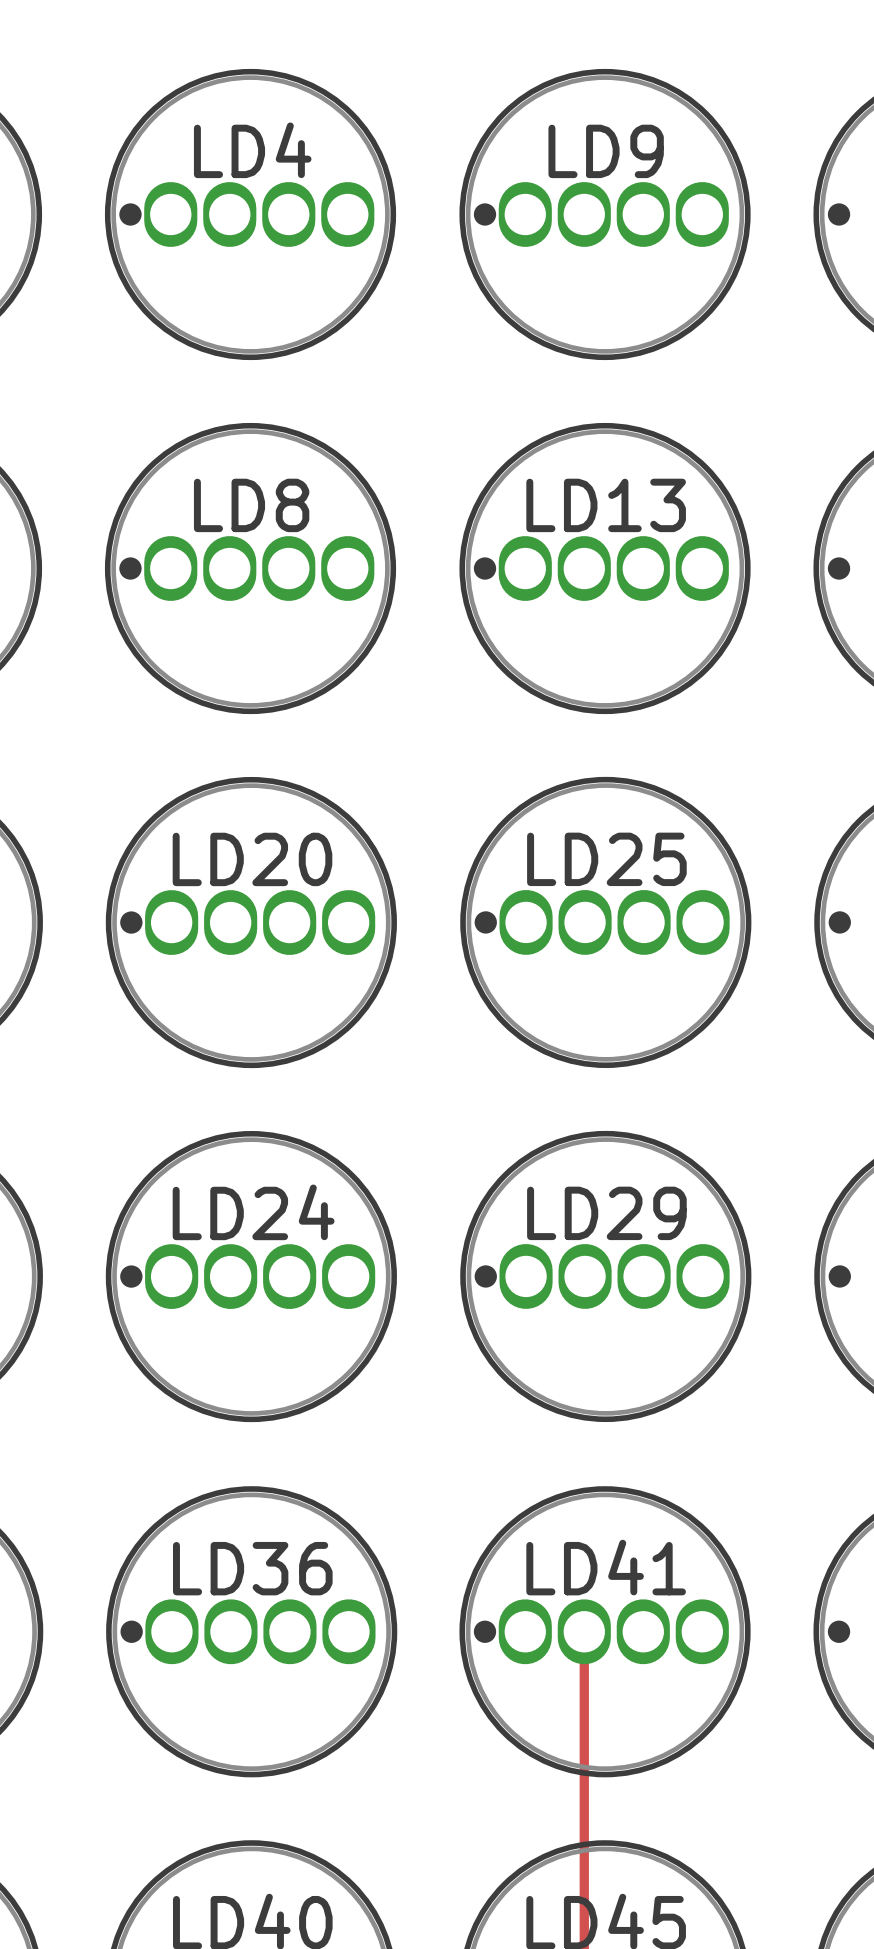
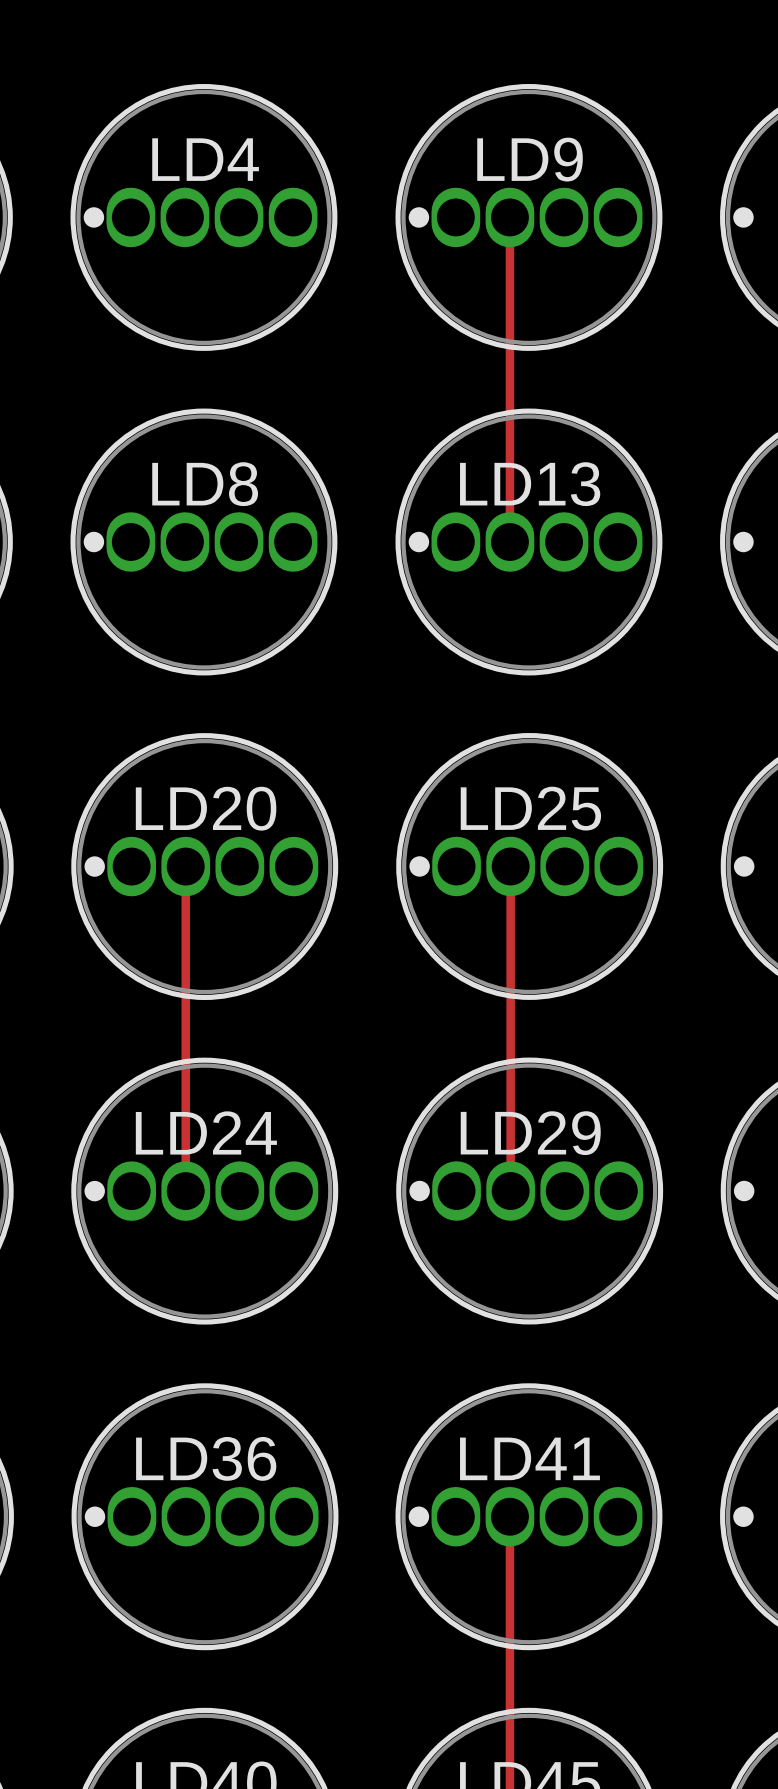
track: none -> (509, 217) (509, 542)
track: none -> (185, 866) (185, 1191)
track: none -> (510, 866) (510, 1191)

